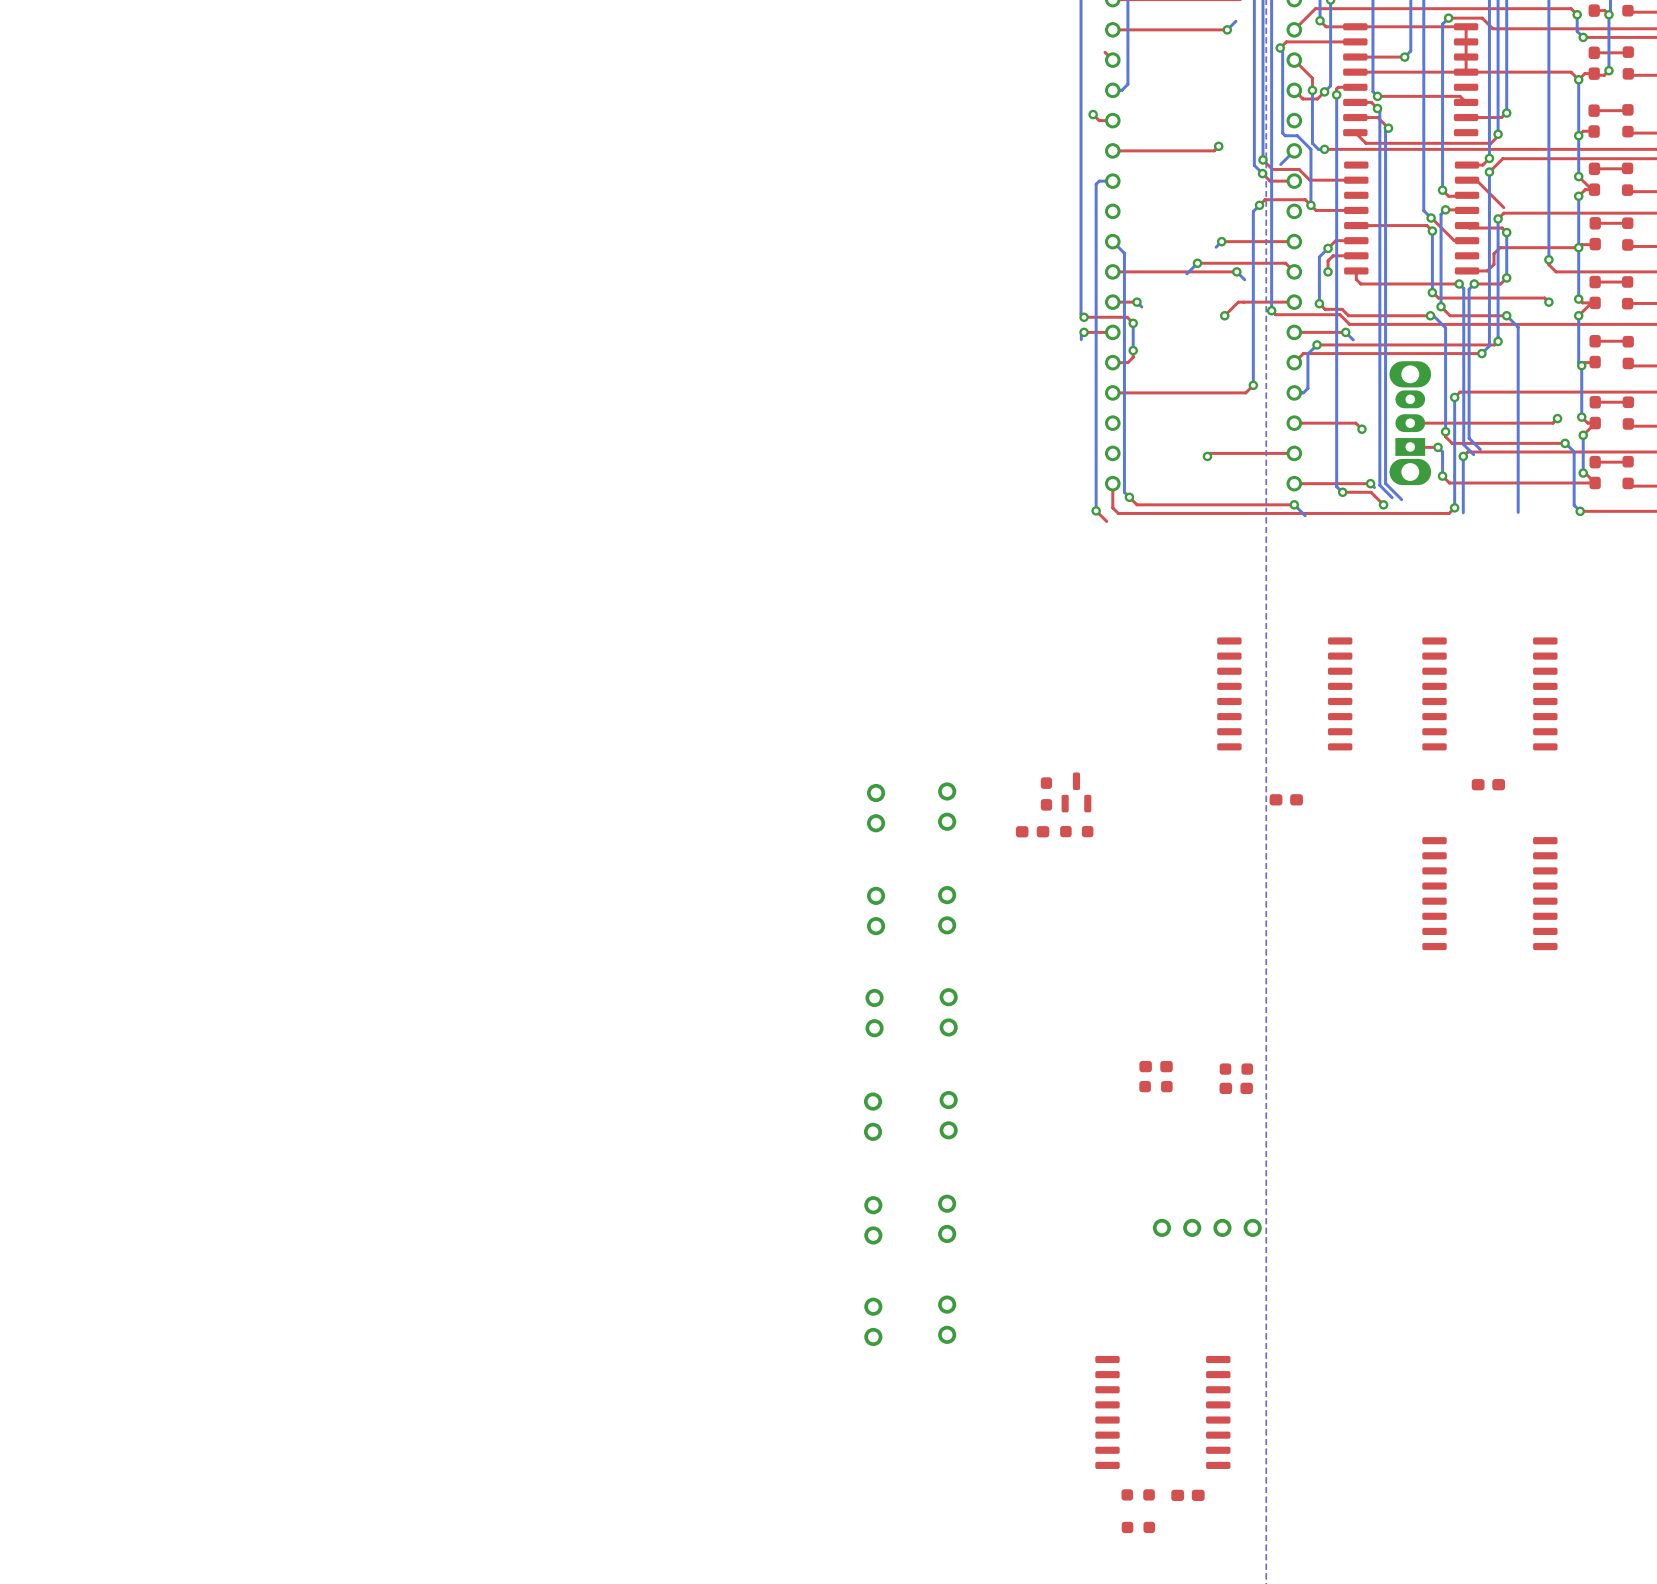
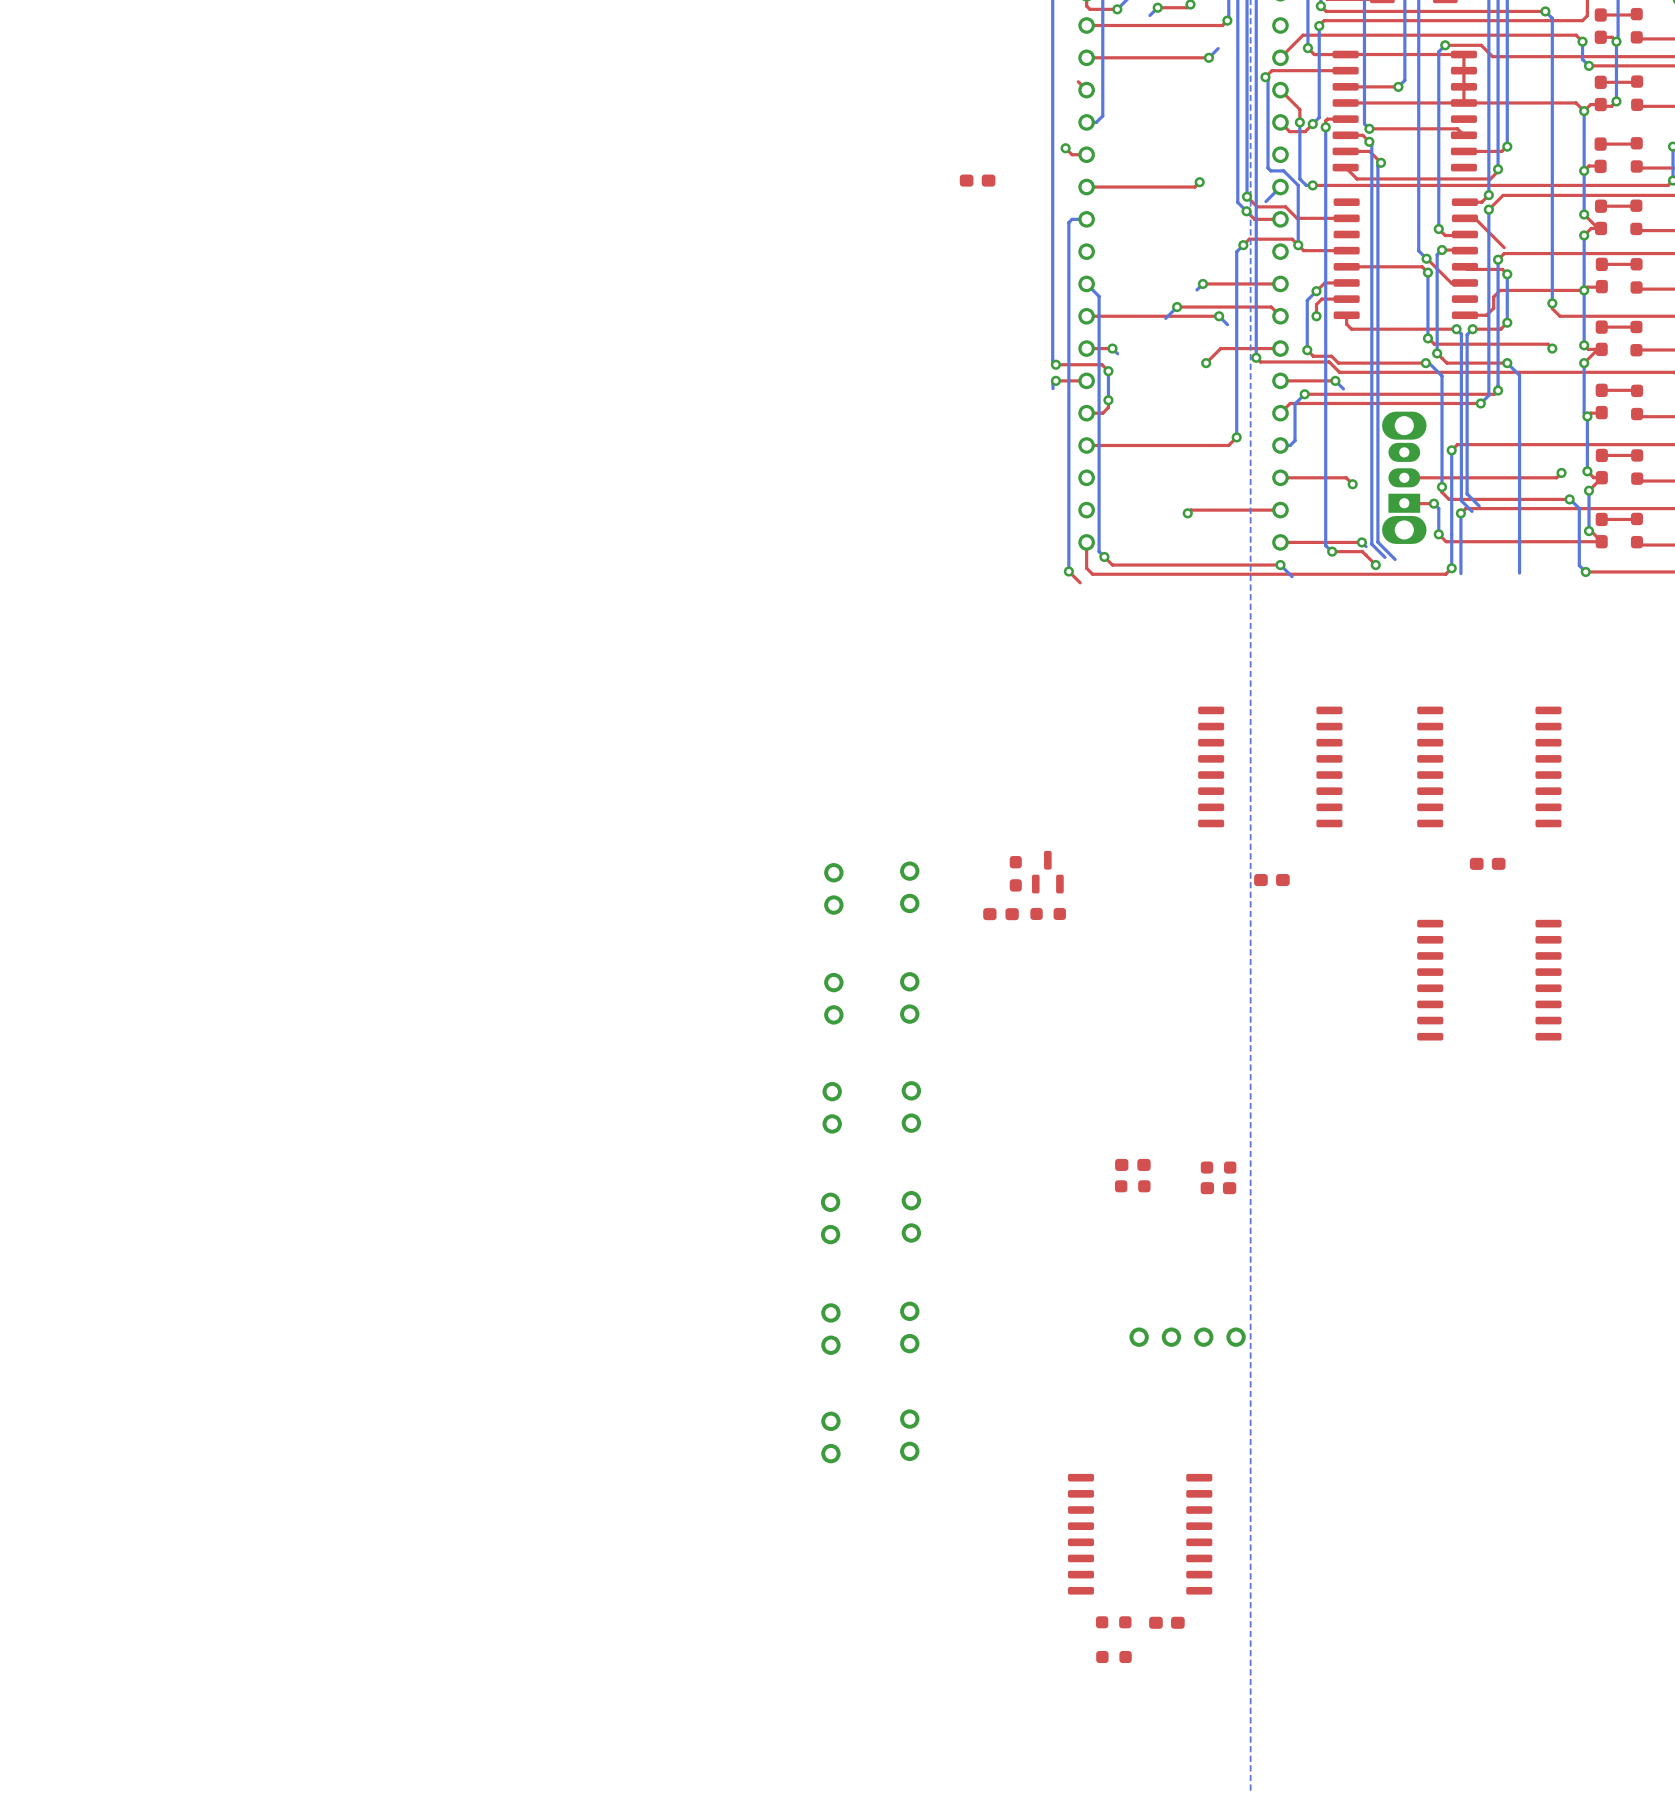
part: none -> (977, 180)

